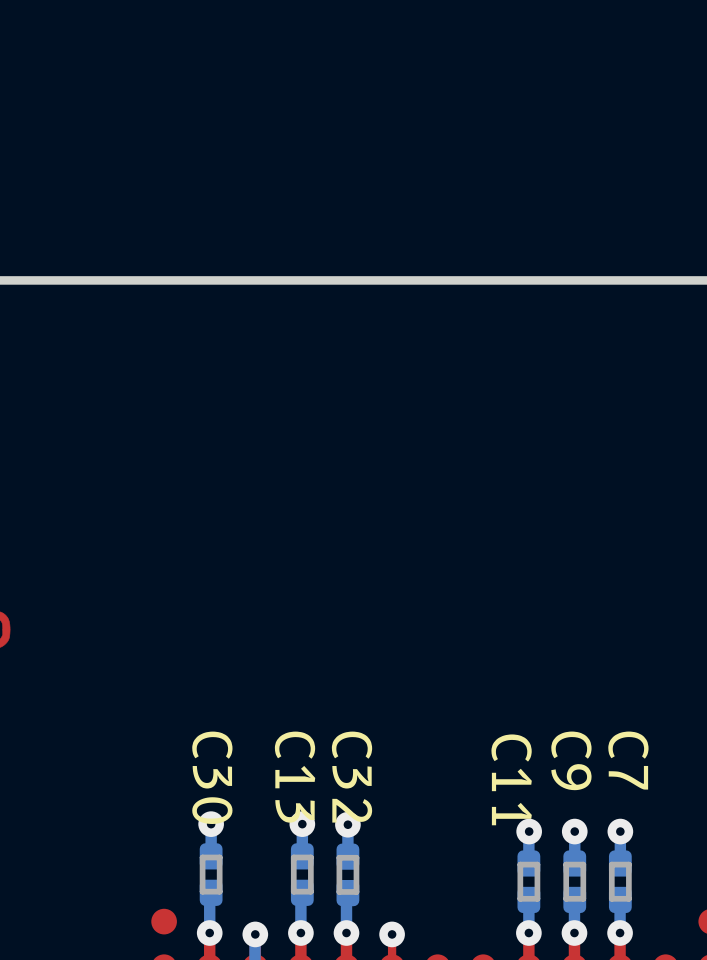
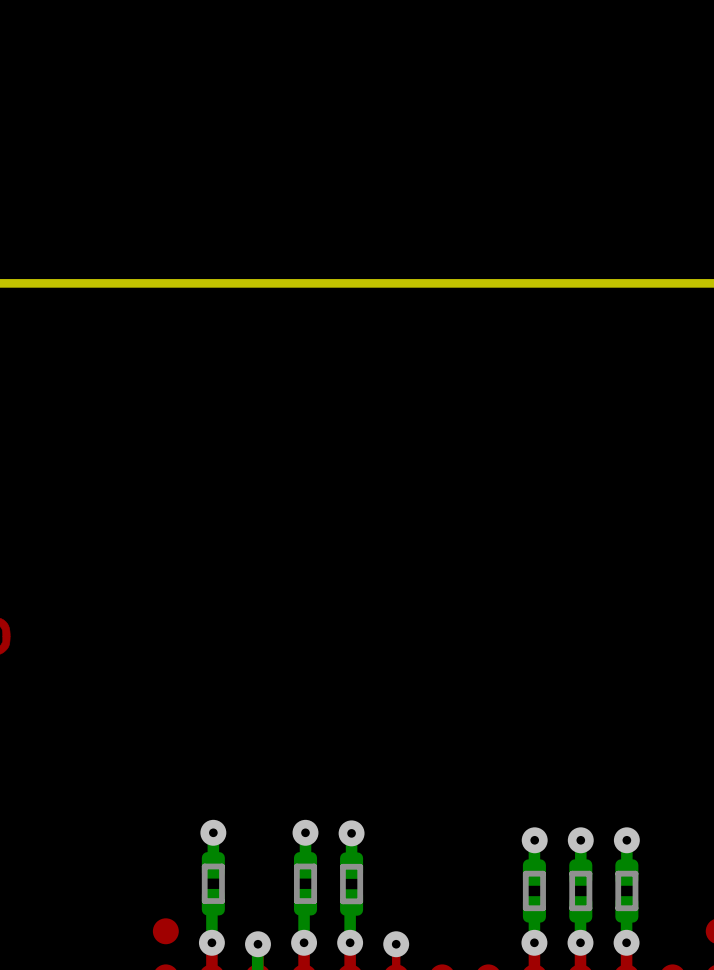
C9 name: C9 (571, 760) -> none
C7 name: C7 (628, 760) -> none
C30 name: C30 (212, 777) -> none
C13 name: C13 (295, 777) -> none
C32 name: C32 (352, 777) -> none
C11 name: C11 (511, 779) -> none

